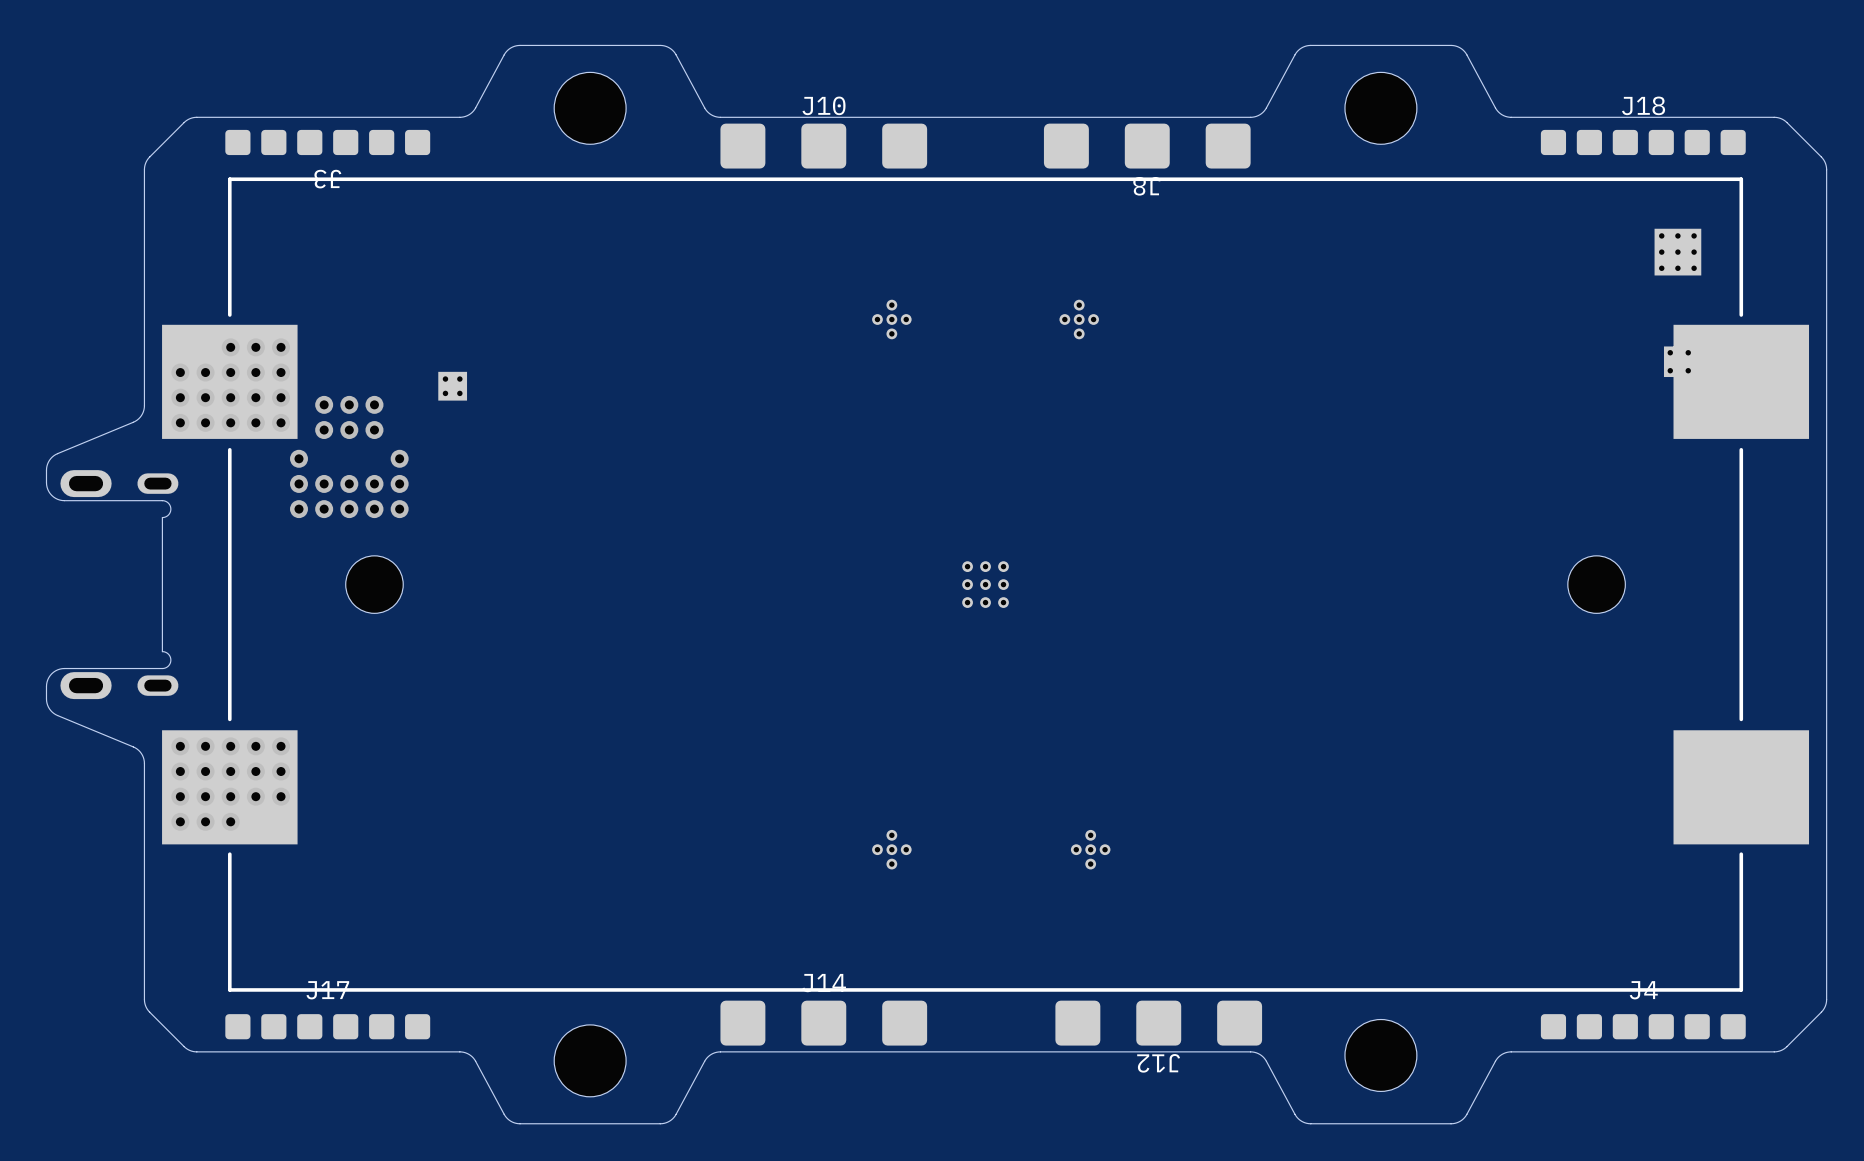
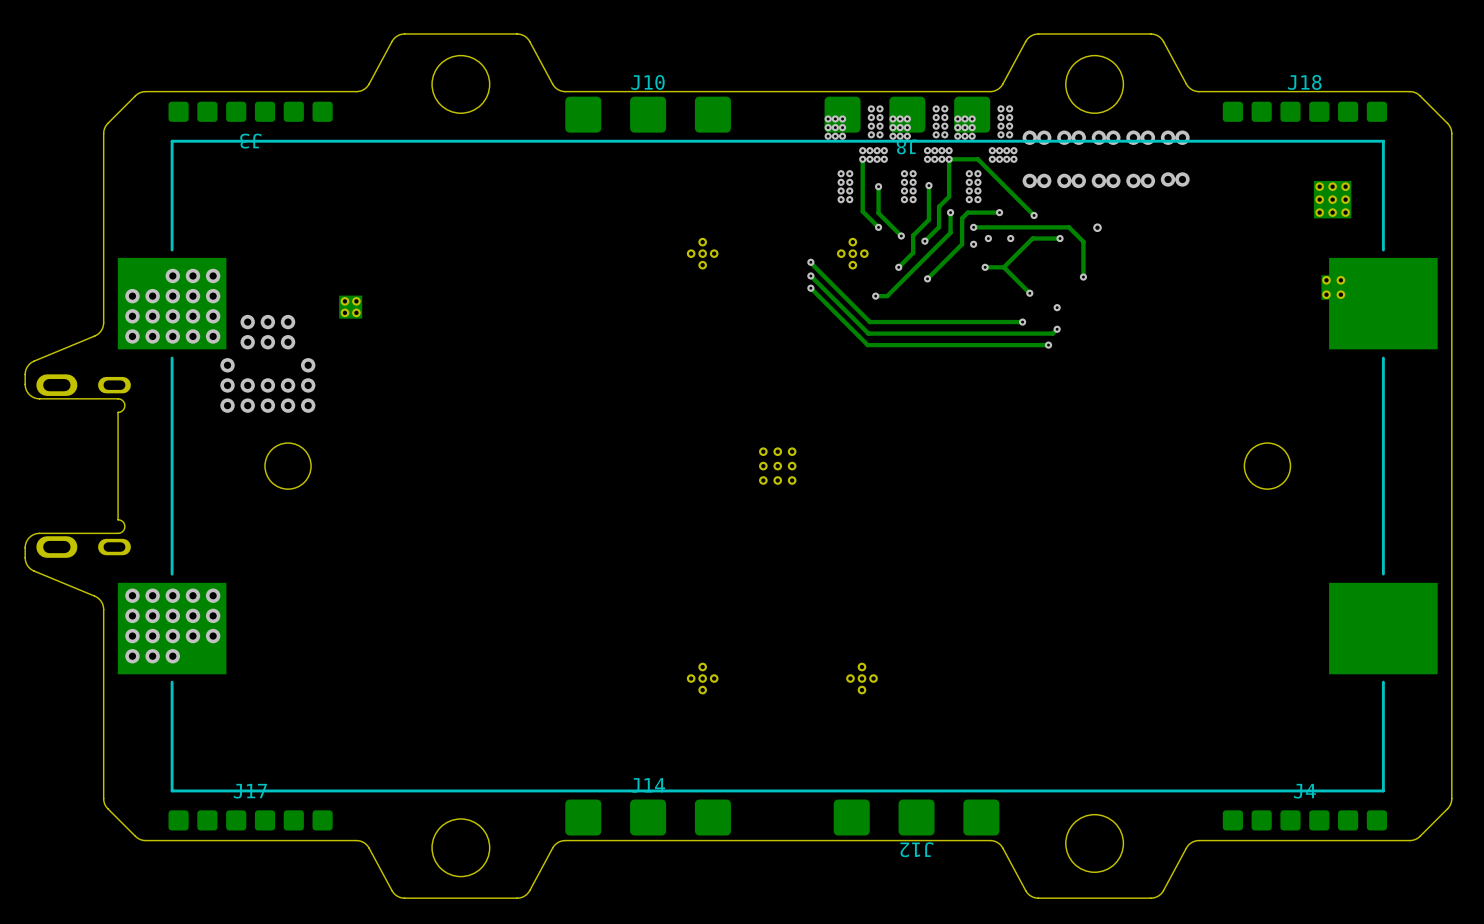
via: none -> (871, 108)
via: none -> (880, 108)
via: none -> (936, 108)
via: none -> (944, 108)
via: none -> (1000, 108)
via: none -> (1009, 108)
via: none -> (871, 117)
via: none -> (880, 117)
via: none -> (936, 117)
via: none -> (944, 117)
via: none -> (1000, 117)
via: none -> (1009, 117)
via: none -> (828, 118)
via: none -> (835, 118)
via: none -> (842, 118)
via: none -> (892, 118)
via: none -> (900, 118)
via: none -> (907, 118)
via: none -> (957, 118)
via: none -> (964, 118)
via: none -> (972, 118)
via: none -> (871, 126)
via: none -> (880, 126)
via: none -> (936, 126)
via: none -> (944, 126)
via: none -> (1000, 126)
via: none -> (1009, 126)
via: none -> (828, 127)
via: none -> (835, 127)
via: none -> (842, 127)
via: none -> (892, 127)
via: none -> (900, 127)
via: none -> (907, 127)
via: none -> (957, 127)
via: none -> (964, 127)
via: none -> (972, 127)
via: none -> (871, 134)
via: none -> (880, 134)
via: none -> (936, 134)
via: none -> (944, 134)
via: none -> (1000, 134)
via: none -> (1009, 134)
via: none -> (828, 136)
via: none -> (835, 136)
via: none -> (842, 136)
via: none -> (892, 136)
via: none -> (900, 136)
via: none -> (907, 136)
via: none -> (957, 136)
via: none -> (964, 136)
via: none -> (972, 136)
via: none -> (1029, 137)
via: none -> (1044, 137)
via: none -> (1064, 137)
via: none -> (1078, 137)
via: none -> (1098, 137)
via: none -> (1113, 137)
via: none -> (1133, 137)
via: none -> (1147, 137)
via: none -> (1168, 137)
via: none -> (1182, 137)
via: none -> (862, 150)
via: none -> (869, 150)
via: none -> (877, 150)
via: none -> (884, 150)
via: none -> (927, 150)
via: none -> (934, 150)
via: none -> (941, 150)
via: none -> (949, 150)
via: none -> (992, 150)
via: none -> (999, 150)
via: none -> (1006, 150)
via: none -> (1013, 150)
track: none -> (862, 159) (862, 211) (878, 227)
via: none -> (862, 159)
via: none -> (869, 159)
via: none -> (877, 159)
via: none -> (884, 159)
via: none -> (927, 159)
via: none -> (934, 159)
via: none -> (941, 159)
via: none -> (949, 159)
via: none -> (992, 159)
via: none -> (999, 159)
via: none -> (1006, 159)
via: none -> (1013, 159)
via: none -> (841, 173)
via: none -> (849, 173)
via: none -> (904, 173)
via: none -> (913, 173)
via: none -> (969, 173)
via: none -> (977, 173)
via: none -> (1168, 179)
via: none -> (1182, 179)
via: none -> (1029, 180)
via: none -> (1044, 180)
via: none -> (1064, 180)
via: none -> (1078, 180)
via: none -> (1098, 180)
via: none -> (1113, 180)
via: none -> (1133, 180)
via: none -> (1147, 180)
via: none -> (841, 182)
via: none -> (849, 182)
via: none -> (904, 182)
via: none -> (913, 182)
via: none -> (969, 182)
via: none -> (977, 182)
track: none -> (928, 185) (928, 219) (913, 235) (913, 252) (898, 267)
via: none -> (928, 185)
track: none -> (878, 186) (878, 213) (901, 236)
via: none -> (878, 186)
via: none -> (841, 190)
via: none -> (849, 190)
via: none -> (904, 190)
via: none -> (913, 190)
via: none -> (969, 190)
via: none -> (977, 190)
via: none -> (841, 199)
via: none -> (849, 199)
via: none -> (904, 199)
via: none -> (913, 199)
via: none -> (969, 199)
via: none -> (977, 199)
track: none -> (950, 212) (950, 232) (887, 296) (875, 296)
via: none -> (950, 212)
track: none -> (999, 212) (967, 212) (962, 218) (962, 244) (927, 278)
via: none -> (999, 212)
track: none -> (1034, 215) (977, 159) (949, 159) (949, 196) (939, 206) (939, 227) (924, 241)
via: none -> (1034, 215)
via: none -> (878, 227)
track: none -> (973, 227) (1069, 227) (1083, 241) (1083, 277)
via: none -> (973, 227)
via: none -> (1097, 227)
via: none -> (901, 236)
via: none -> (988, 238)
via: none -> (1010, 238)
track: none -> (1060, 238) (1032, 238) (1003, 267)
via: none -> (1060, 238)
via: none -> (924, 241)
via: none -> (973, 244)
track: none -> (810, 262) (869, 322) (1022, 322)
via: none -> (810, 262)
via: none -> (898, 267)
via: none -> (985, 267)
track: none -> (1003, 267) (985, 267)
track: none -> (1003, 267) (1029, 293)
track: none -> (810, 275) (868, 333) (1052, 333) (1057, 329)
via: none -> (810, 275)
via: none -> (1083, 277)
via: none -> (927, 278)
track: none -> (810, 288) (867, 345) (1048, 345)
via: none -> (810, 288)
via: none -> (1029, 293)
via: none -> (875, 296)
via: none -> (1057, 307)
via: none -> (1022, 322)
via: none -> (1057, 329)
via: none -> (1048, 345)

